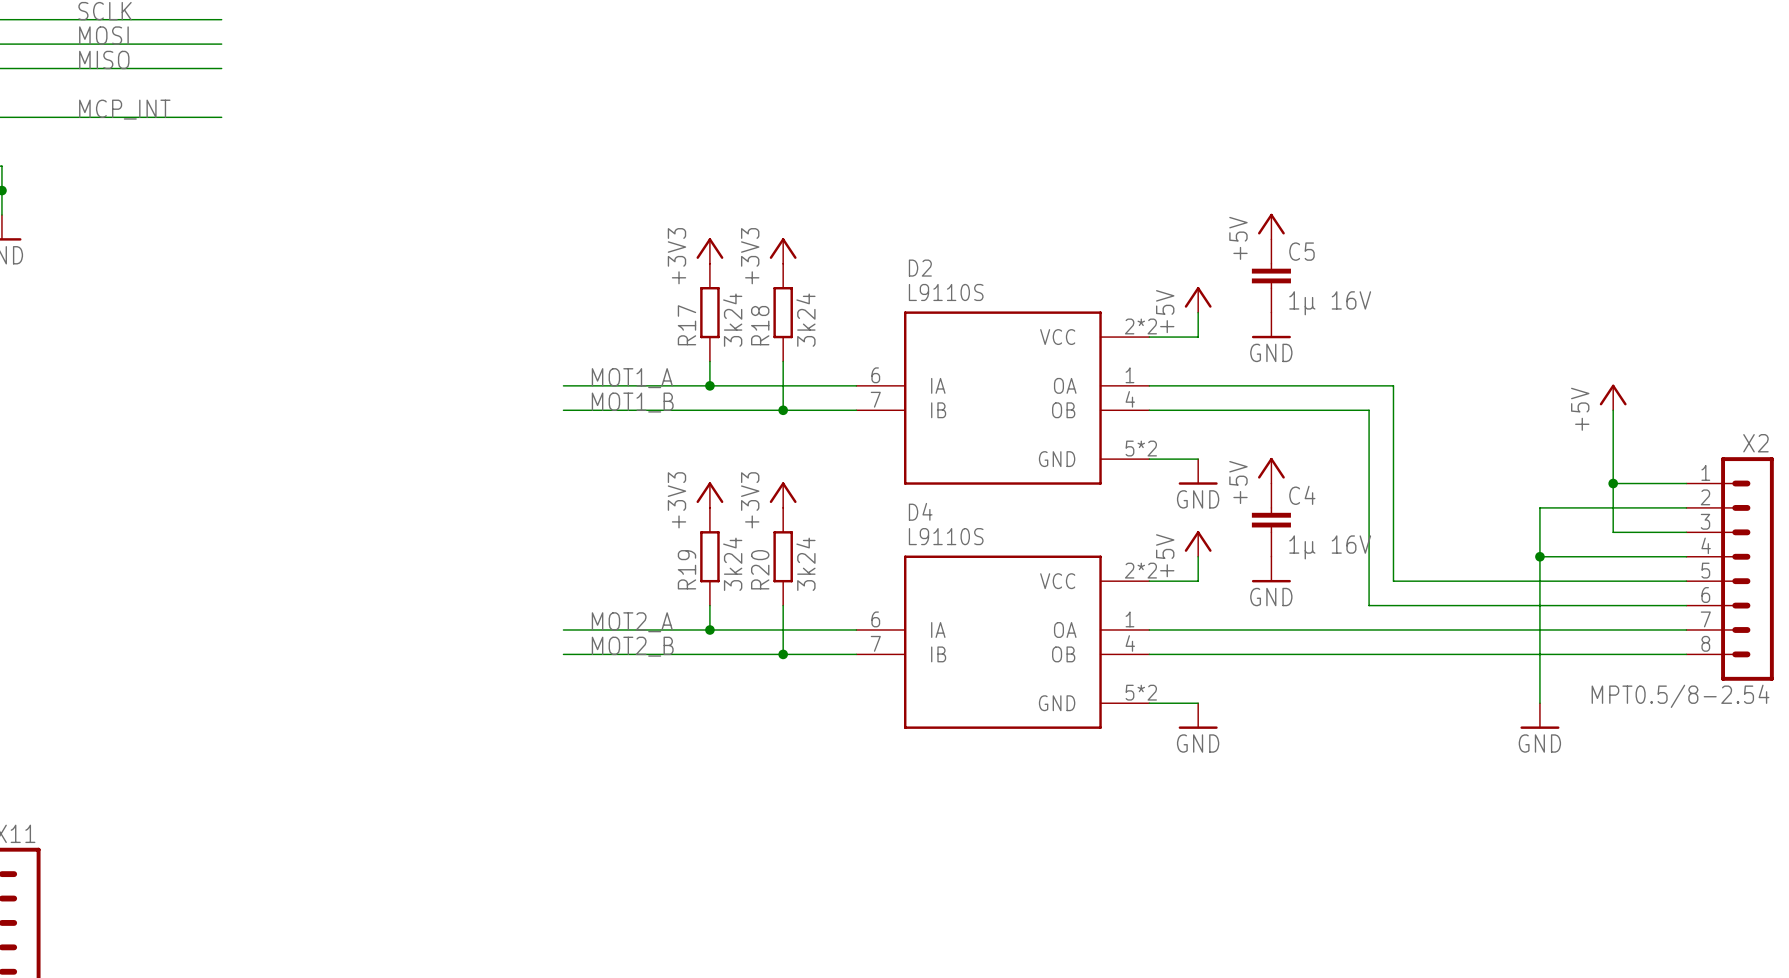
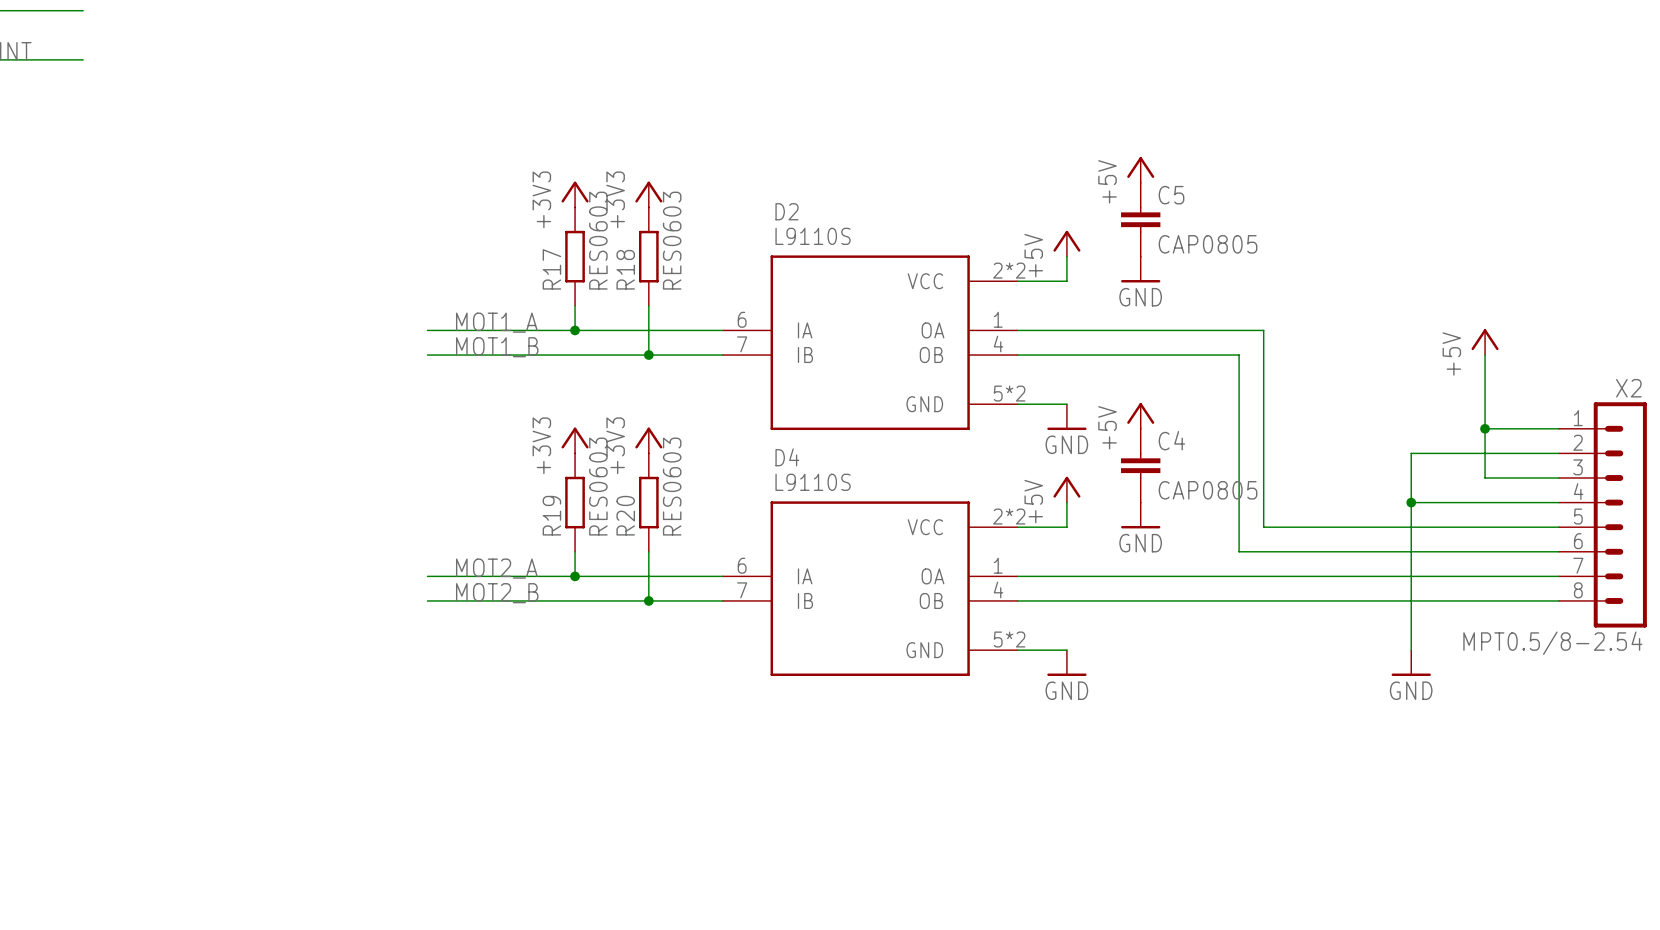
C5 value: 1µ 16V (1330, 303) -> CAP0805 (1208, 244)
R17 value: 3k24 (732, 320) -> RES0603 (598, 240)
R18 value: 3k24 (805, 320) -> RES0603 (672, 240)
C4 value: 1µ 16V (1330, 547) -> CAP0805 (1208, 490)
R19 value: 3k24 (732, 564) -> RES0603 (598, 486)
R20 value: 3k24 (805, 564) -> RES0603 (672, 486)

